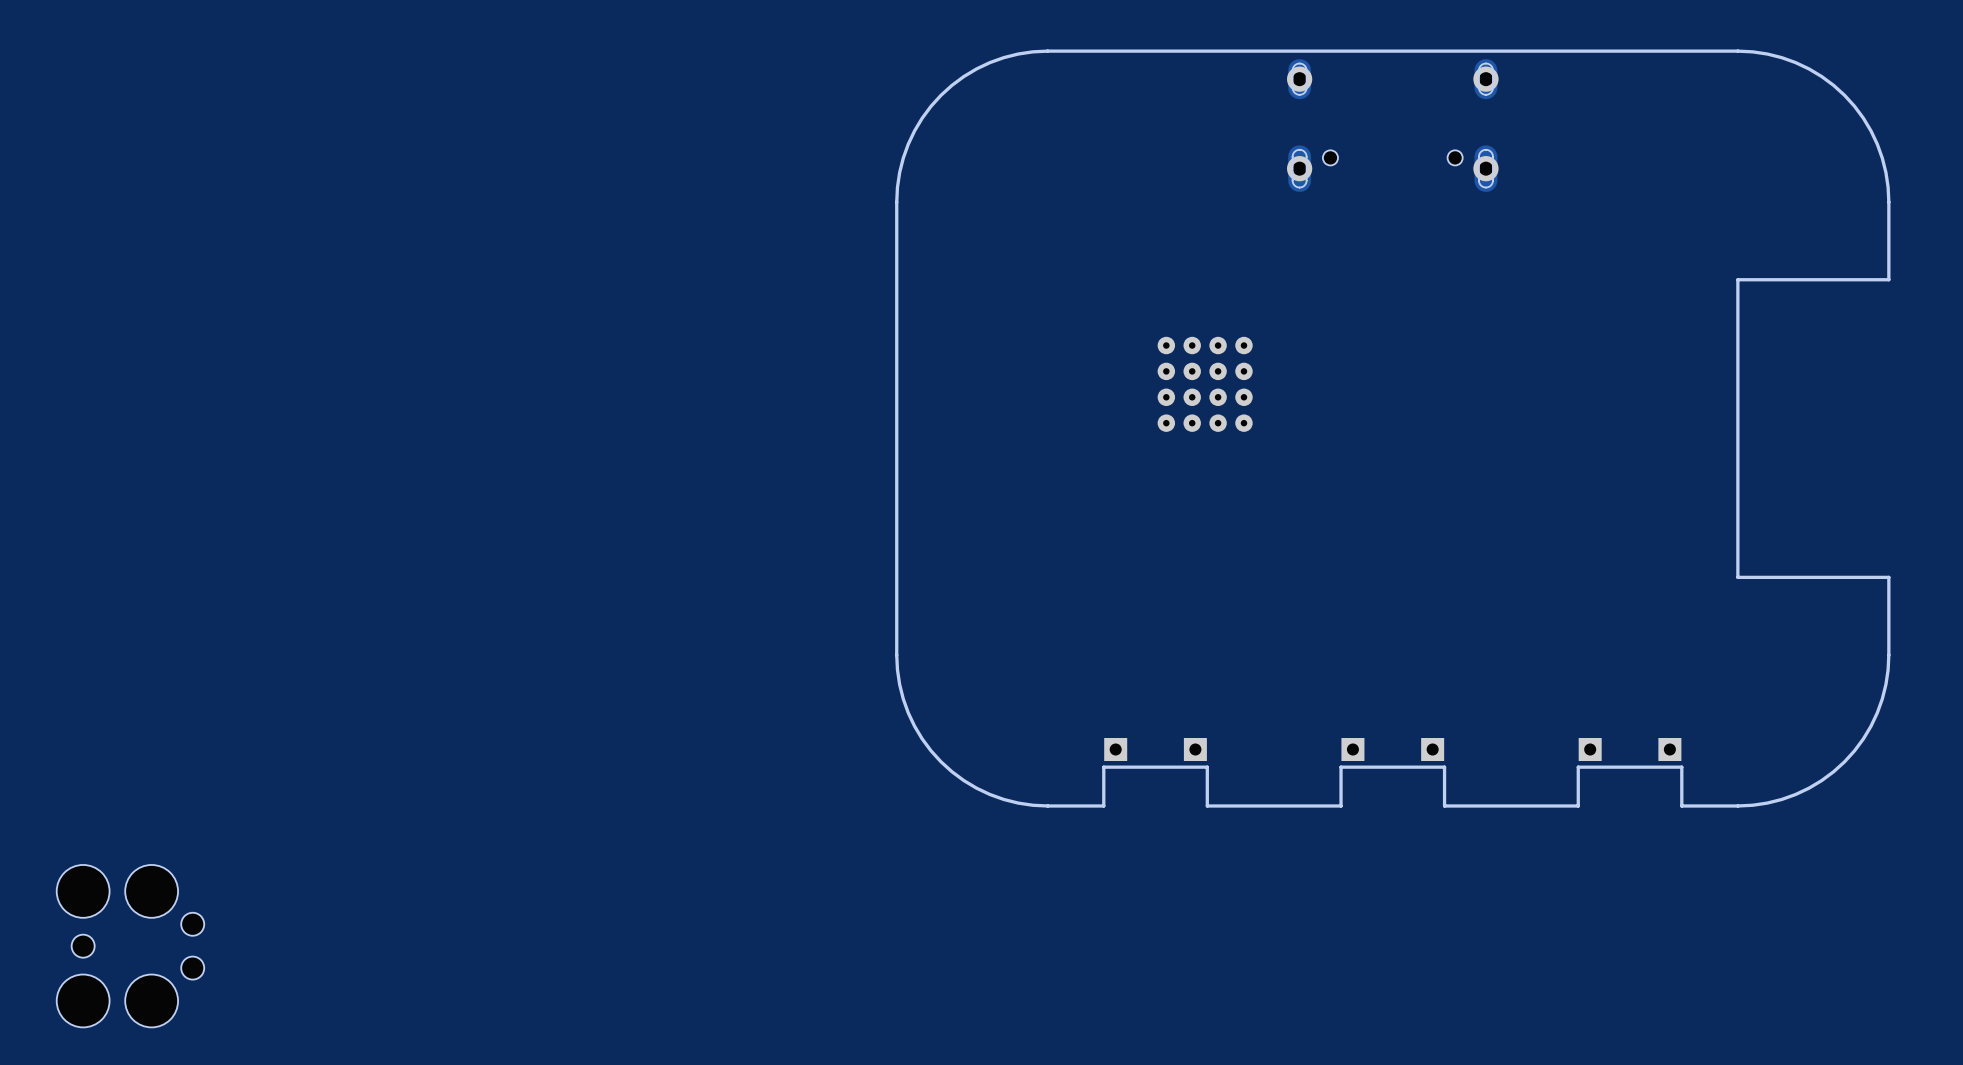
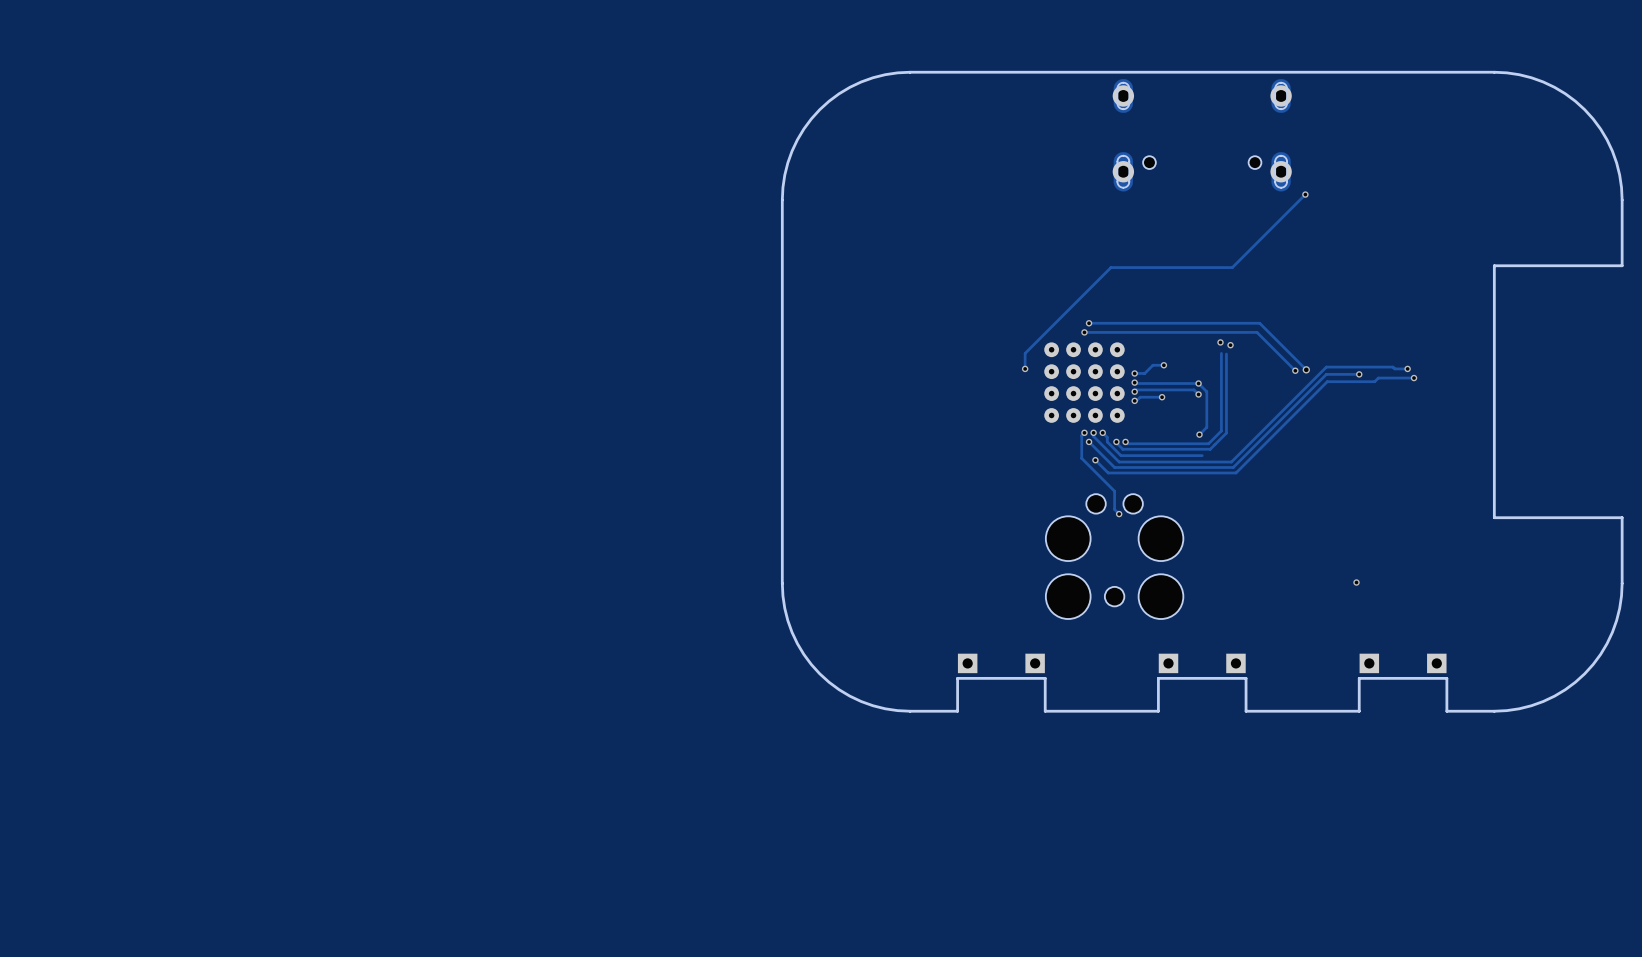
track: none -> (1305, 194) (1232, 267) (1110, 267) (1025, 353) (1025, 368)
via: none -> (1305, 194)
track: none -> (1089, 323) (1259, 323) (1306, 369)
via: none -> (1089, 323)
track: none -> (1084, 332) (1257, 332) (1295, 370)
via: none -> (1084, 332)
via: none -> (1220, 342)
via: none -> (1230, 345)
track: none -> (1221, 353) (1221, 430) (1208, 443) (1127, 443) (1126, 441)
part position: (1205, 384) -> (1084, 382)
track: none -> (1226, 354) (1226, 433) (1210, 449) (1122, 449) (1116, 441)
track: none -> (1163, 365) (1152, 365) (1144, 373) (1134, 373)
via: none -> (1163, 365)
via: none -> (1025, 368)
track: none -> (1407, 368) (1326, 367) (1231, 462) (1119, 462) (1093, 436) (1093, 432)
via: none -> (1407, 368)
via: none -> (1306, 369)
via: none -> (1295, 370)
via: none -> (1134, 373)
track: none -> (1359, 374) (1326, 374) (1233, 467) (1114, 467) (1089, 441)
via: none -> (1359, 374)
track: none -> (1414, 378) (1378, 378) (1374, 381) (1327, 381) (1236, 472) (1108, 472) (1095, 460)
via: none -> (1414, 378)
track: none -> (1134, 382) (1198, 383) (1206, 391) (1206, 427) (1199, 434)
via: none -> (1134, 382)
via: none -> (1198, 383)
track: none -> (1134, 391) (1136, 389) (1194, 389) (1198, 394)
via: none -> (1134, 391)
via: none -> (1198, 394)
track: none -> (1162, 397) (1140, 397) (1134, 400)
via: none -> (1162, 397)
via: none -> (1134, 400)
track: none -> (1084, 432) (1081, 435) (1081, 458) (1114, 491) (1114, 509) (1119, 514)
via: none -> (1084, 432)
via: none -> (1093, 432)
track: none -> (1102, 432) (1107, 437) (1107, 441) (1120, 455) (1202, 455)
via: none -> (1102, 432)
via: none -> (1199, 434)
via: none -> (1089, 441)
via: none -> (1116, 441)
via: none -> (1125, 441)
via: none -> (1095, 460)
via: none -> (1119, 514)
part: none -> (1114, 556)
via: none -> (1356, 582)
part: (130, 946) -> none

